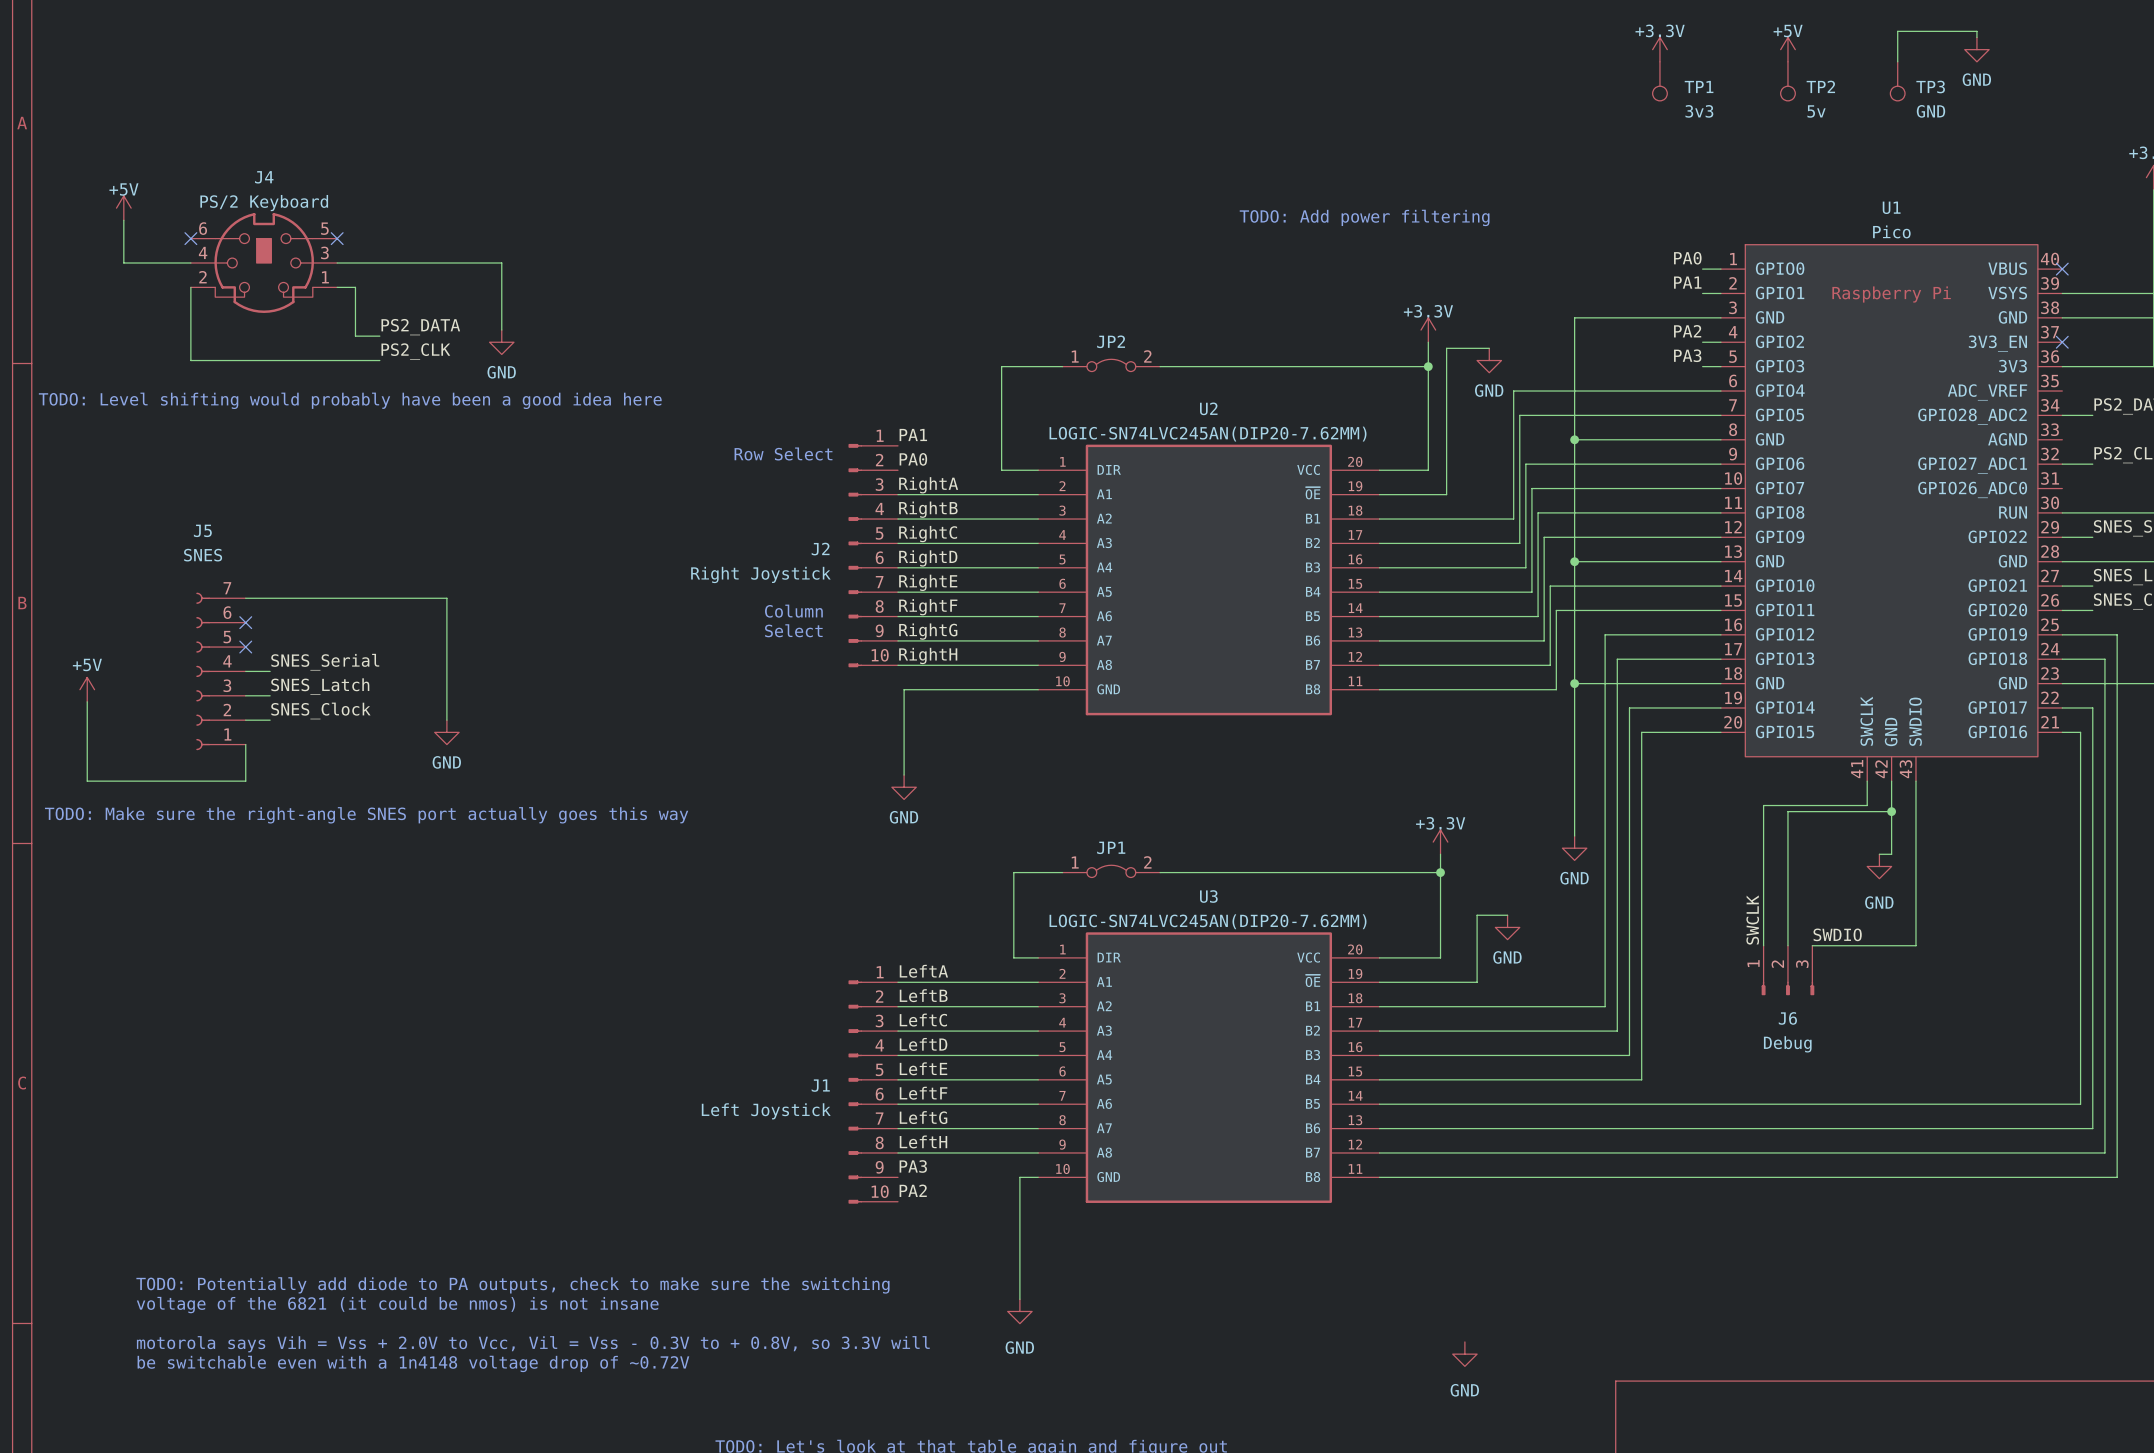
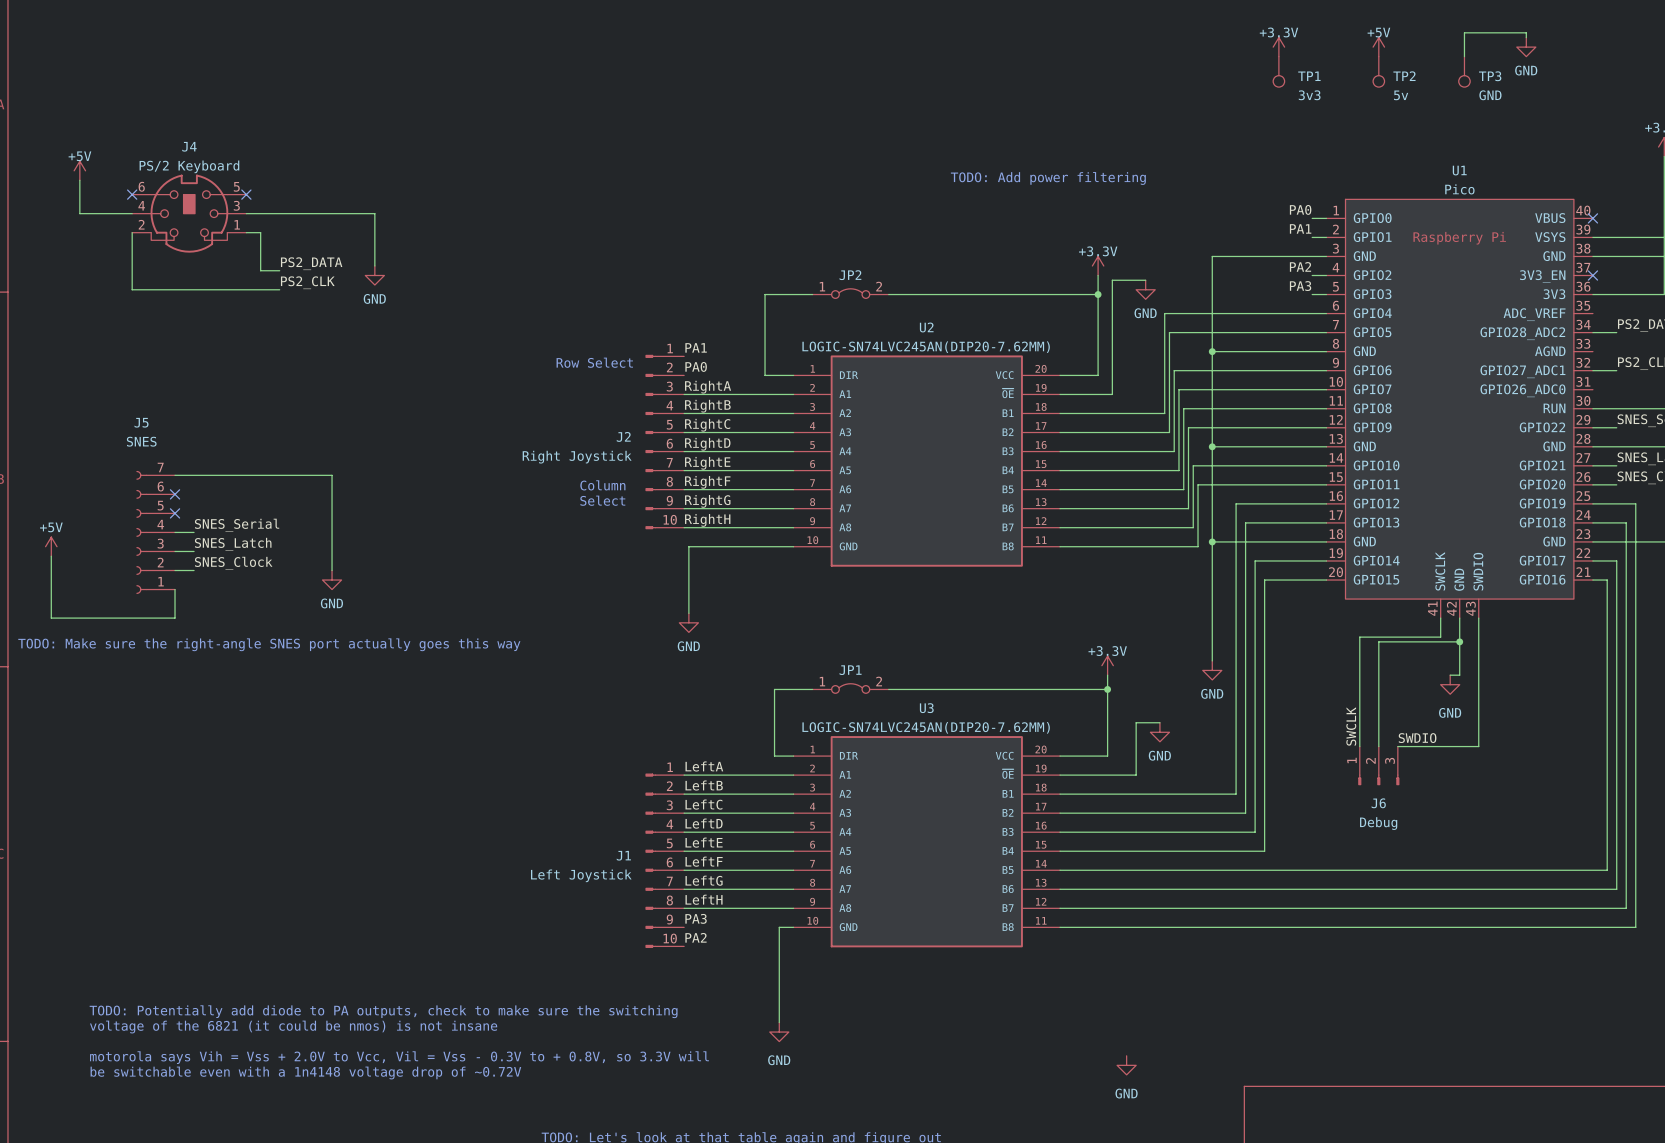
text: TODO: Level shifting would probably have been a good idea here (350, 400) -> none

